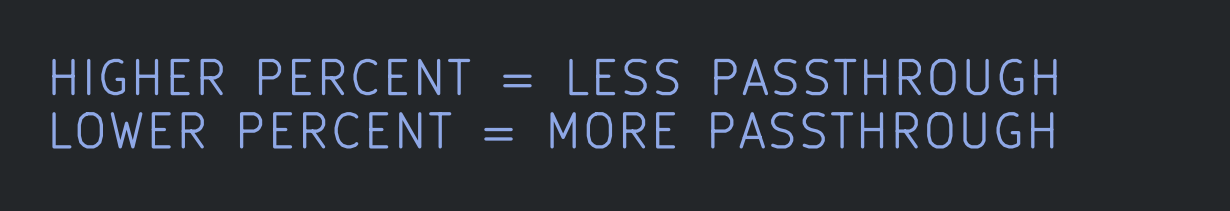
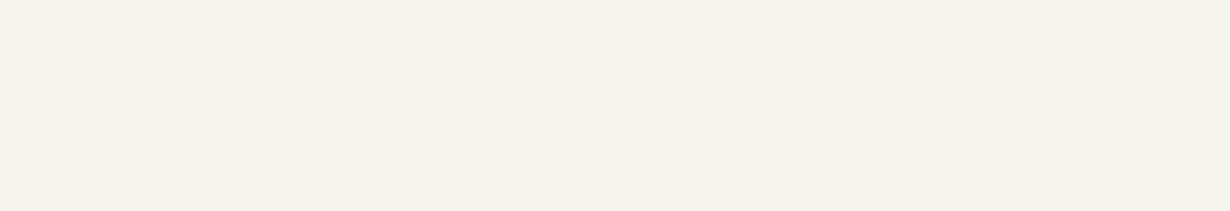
text: HIGHER PERCENT = LESS PASSTHROUGH (554, 77) -> none
text: LOWER PERCENT = MORE PASSTHROUGH (552, 130) -> none

